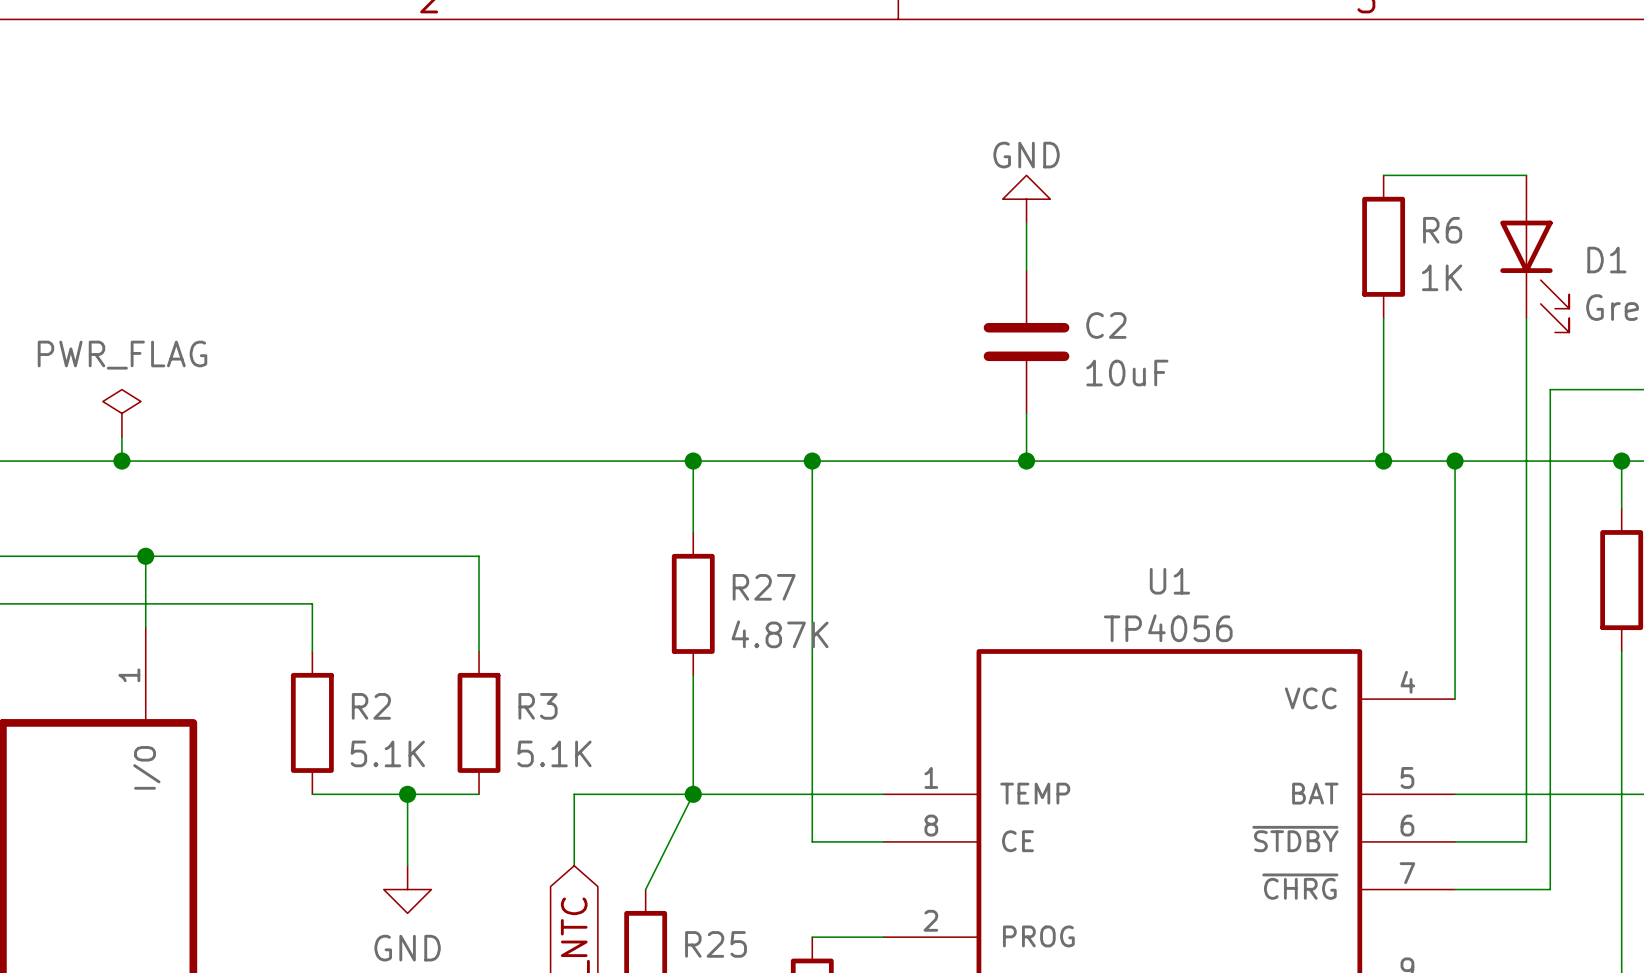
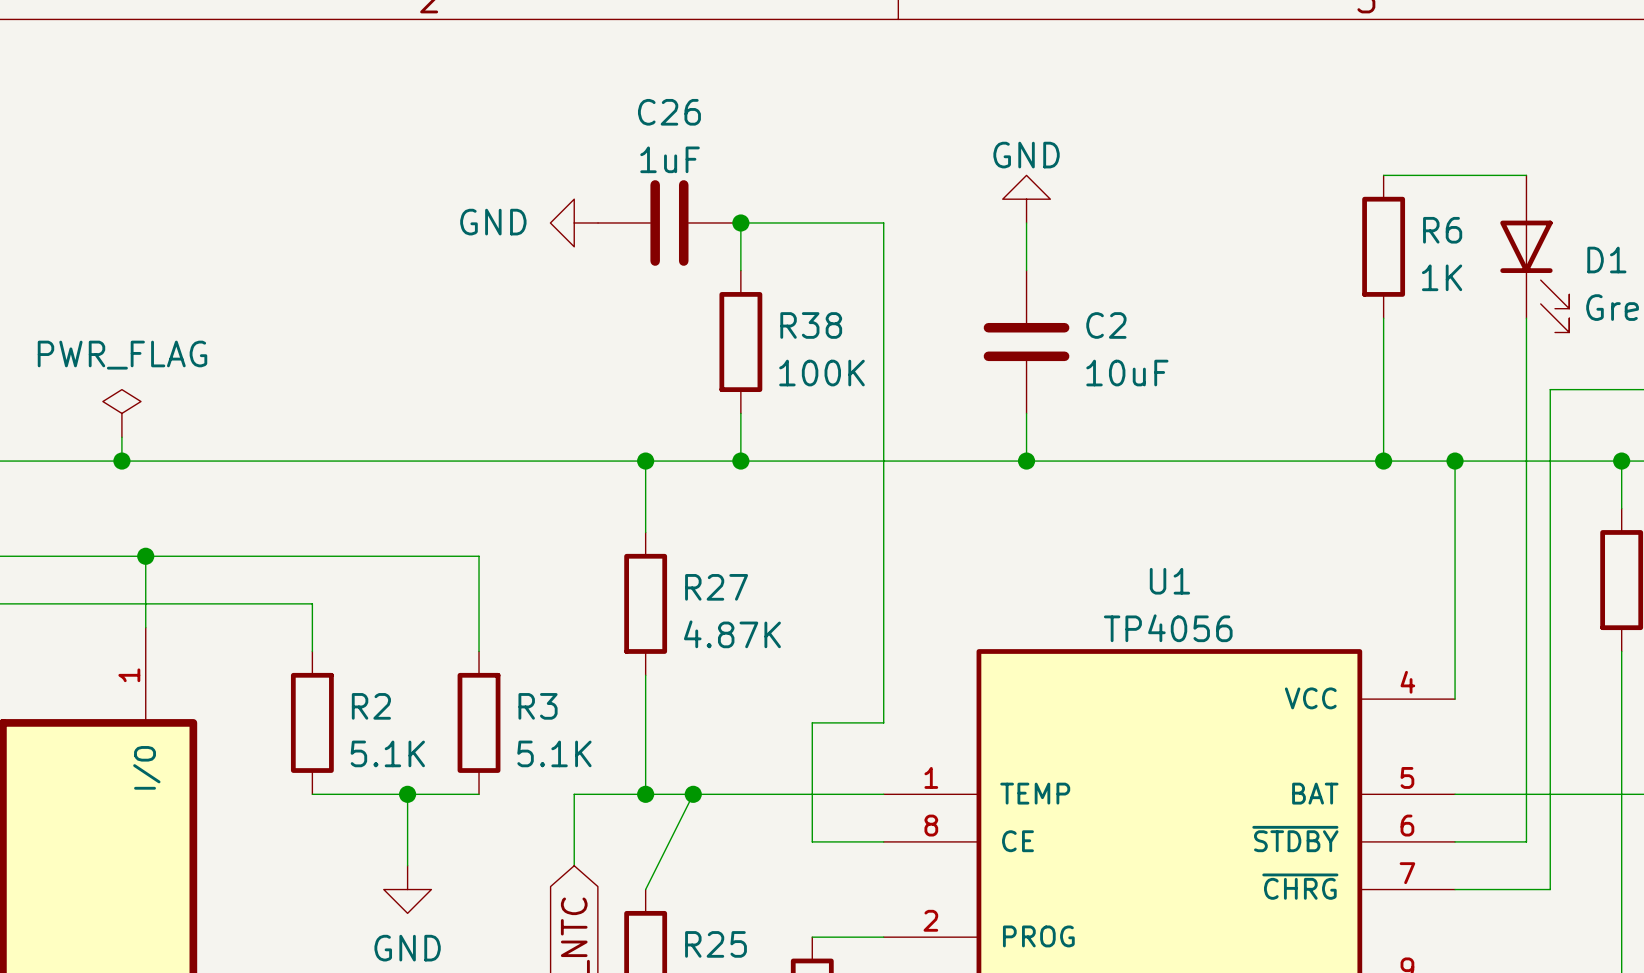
power symbol: none -> GND (574, 222)
C26: none -> 1uF (669, 222)
junction: none -> (740, 222)
R38: none -> 100K (740, 342)
wire: none -> (740, 413) (740, 461)
junction: none -> (645, 461)
wire: (693, 461) (693, 532) -> (645, 461) (645, 532)
junction: (693, 461) -> none
junction: none -> (740, 461)
wire: (812, 461) (812, 722) -> (740, 270) (740, 222) (883, 222) (883, 722) (812, 722)
junction: (812, 461) -> none
R27 position: (693, 603) -> (645, 603)
wire: (693, 675) (693, 794) -> (645, 675) (645, 794)
junction: none -> (645, 794)

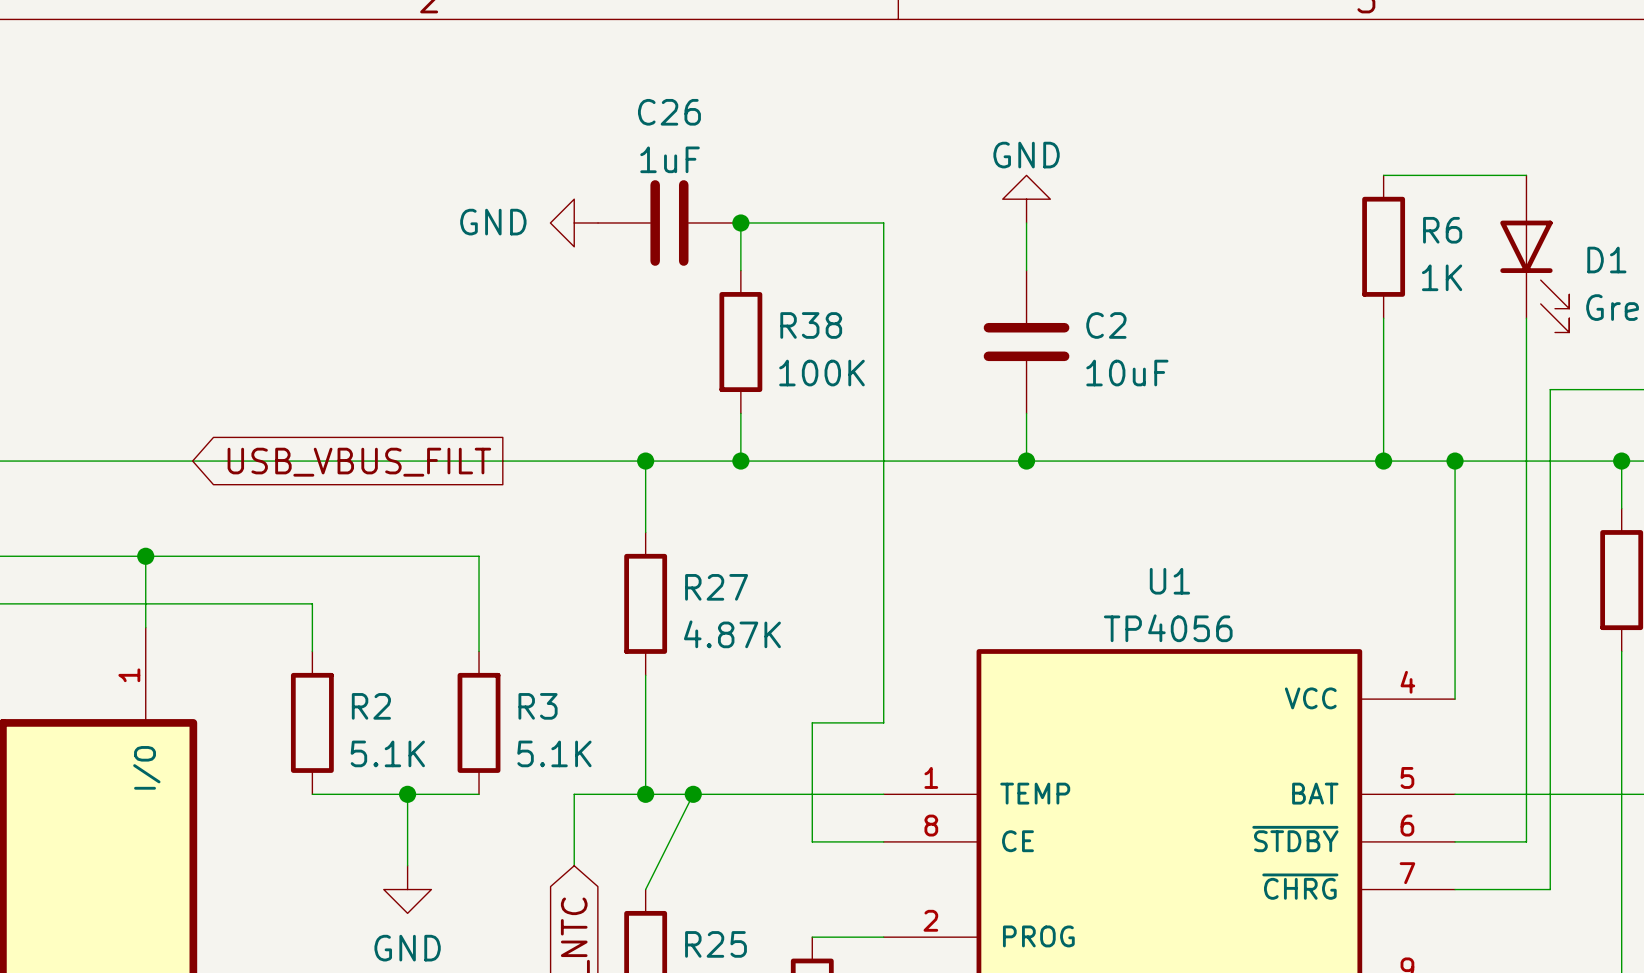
power symbol: PWR_FLAG (121, 413) -> none
wire: (121, 437) (121, 461) -> none
junction: (121, 461) -> none
global label: none -> USB_VBUS_FILT (359, 462)

